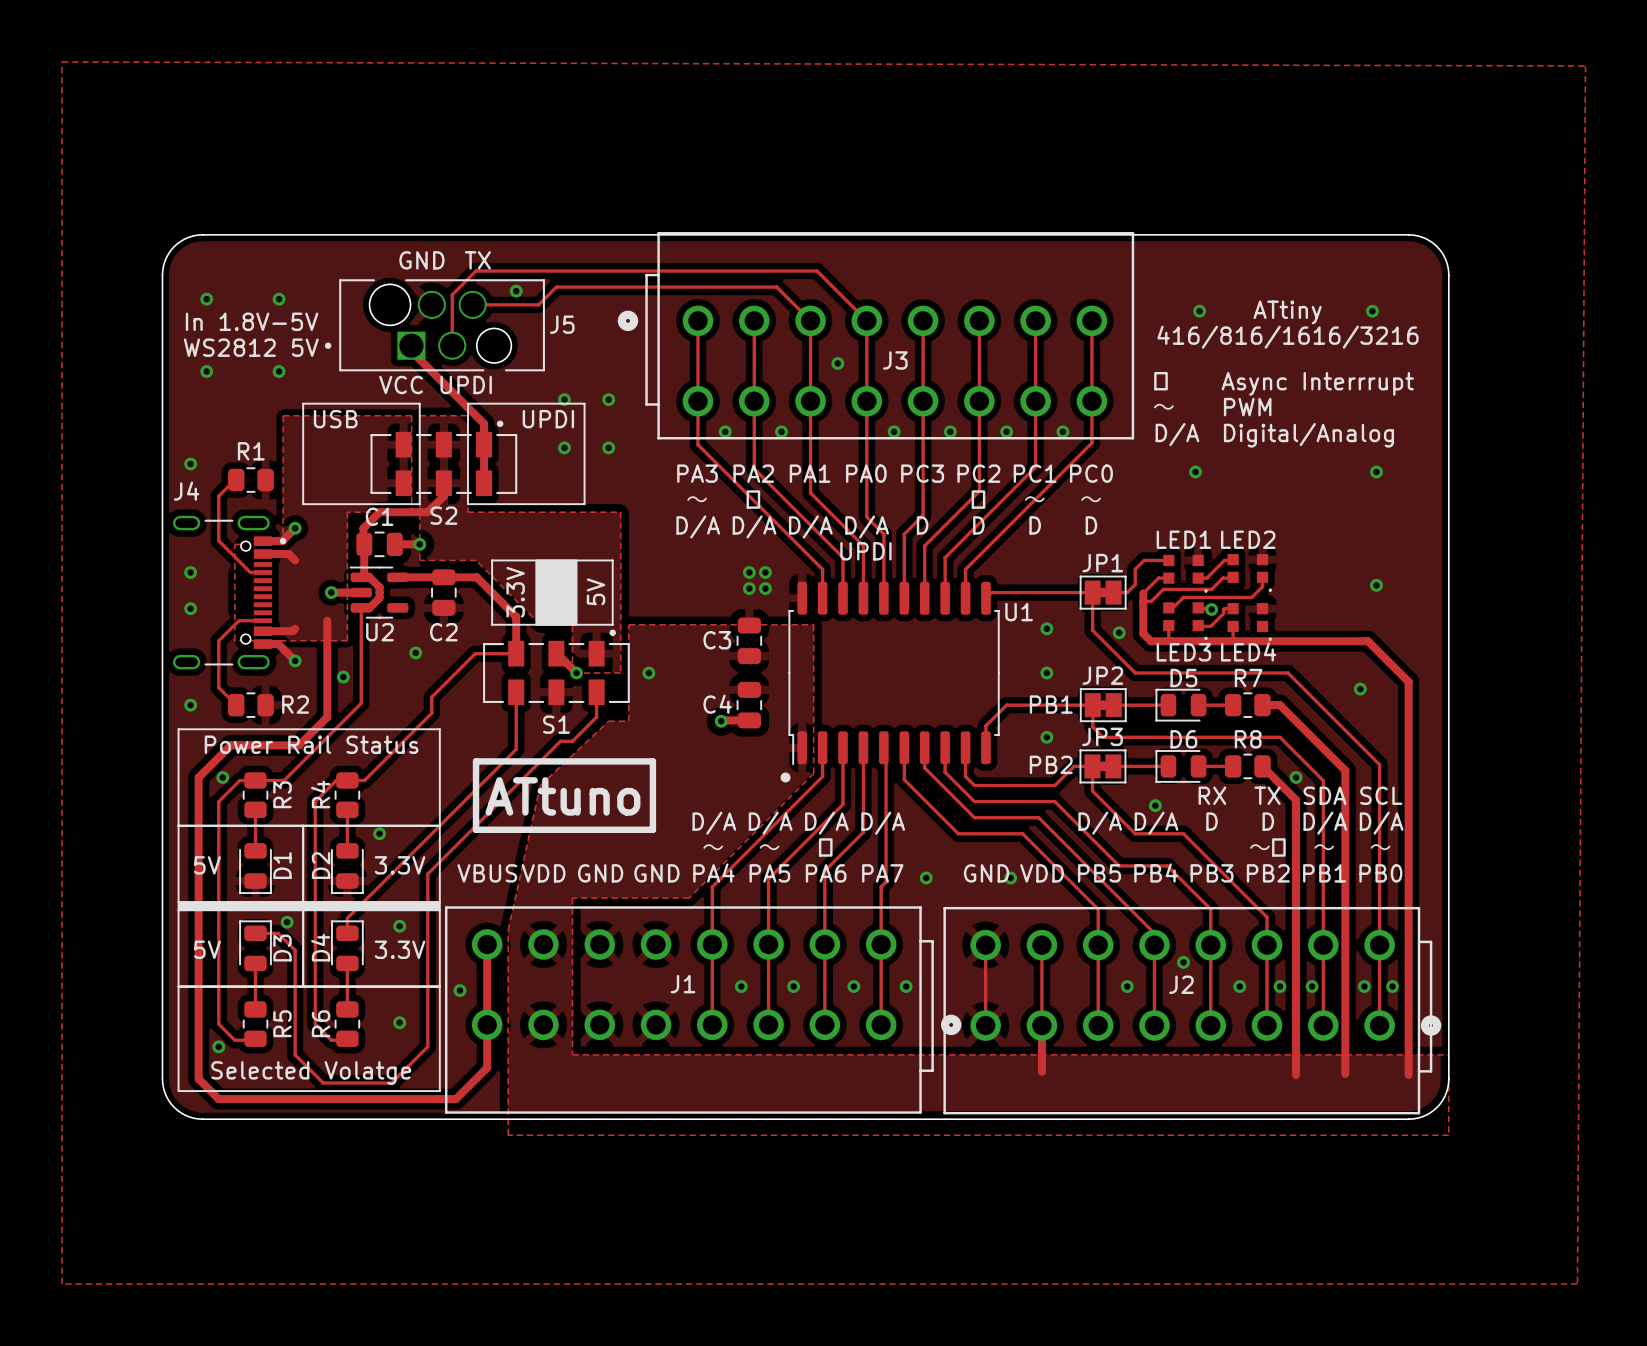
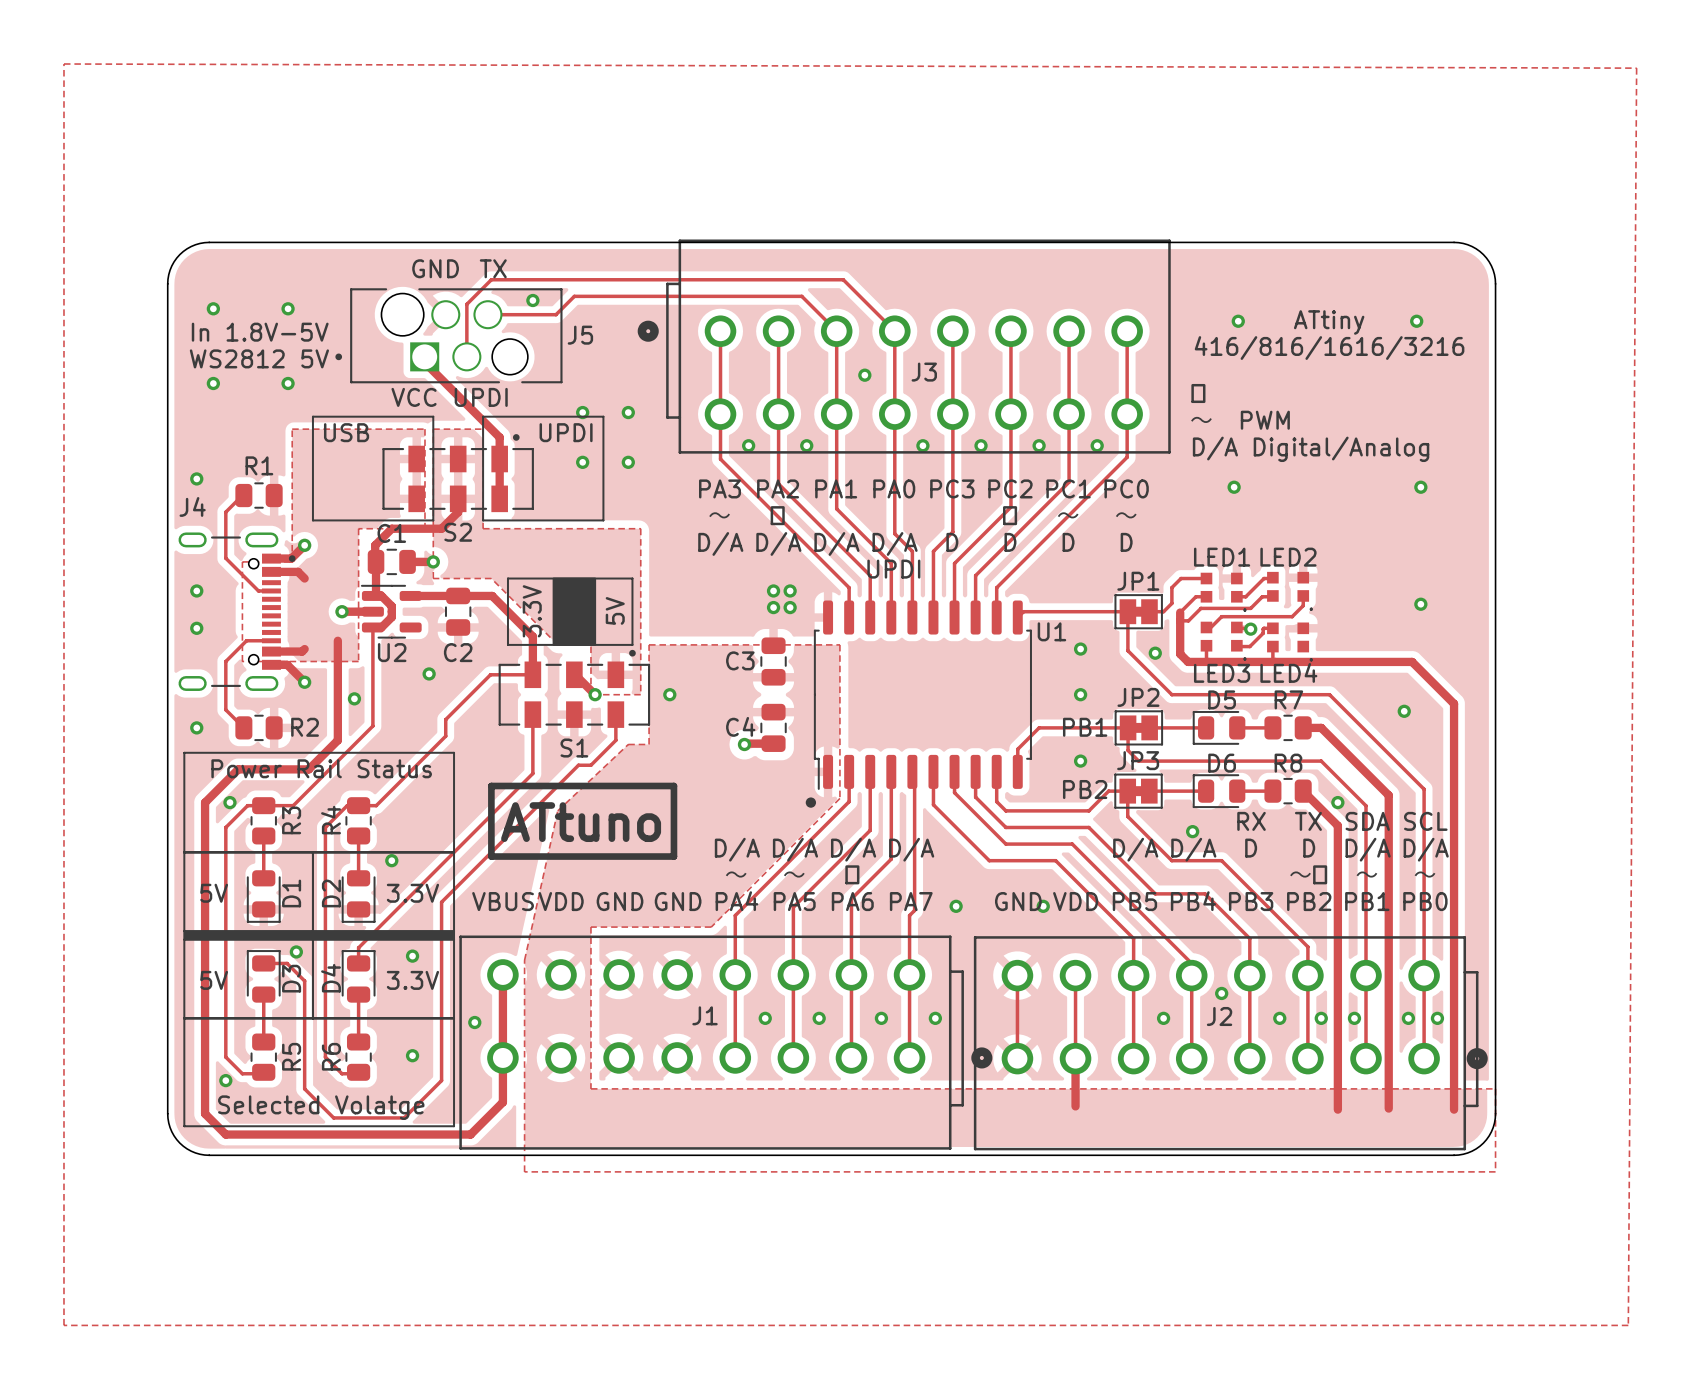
text: Async Interrrupt (1317, 383) -> none
text: 〜 (1163, 406) -> 〜 PWM (1239, 420)
text: PWM (1247, 407) -> none
text: D/A (1177, 434) -> D/A Digital/Analog (1311, 449)
text: Digital/Analog (1308, 435) -> none

